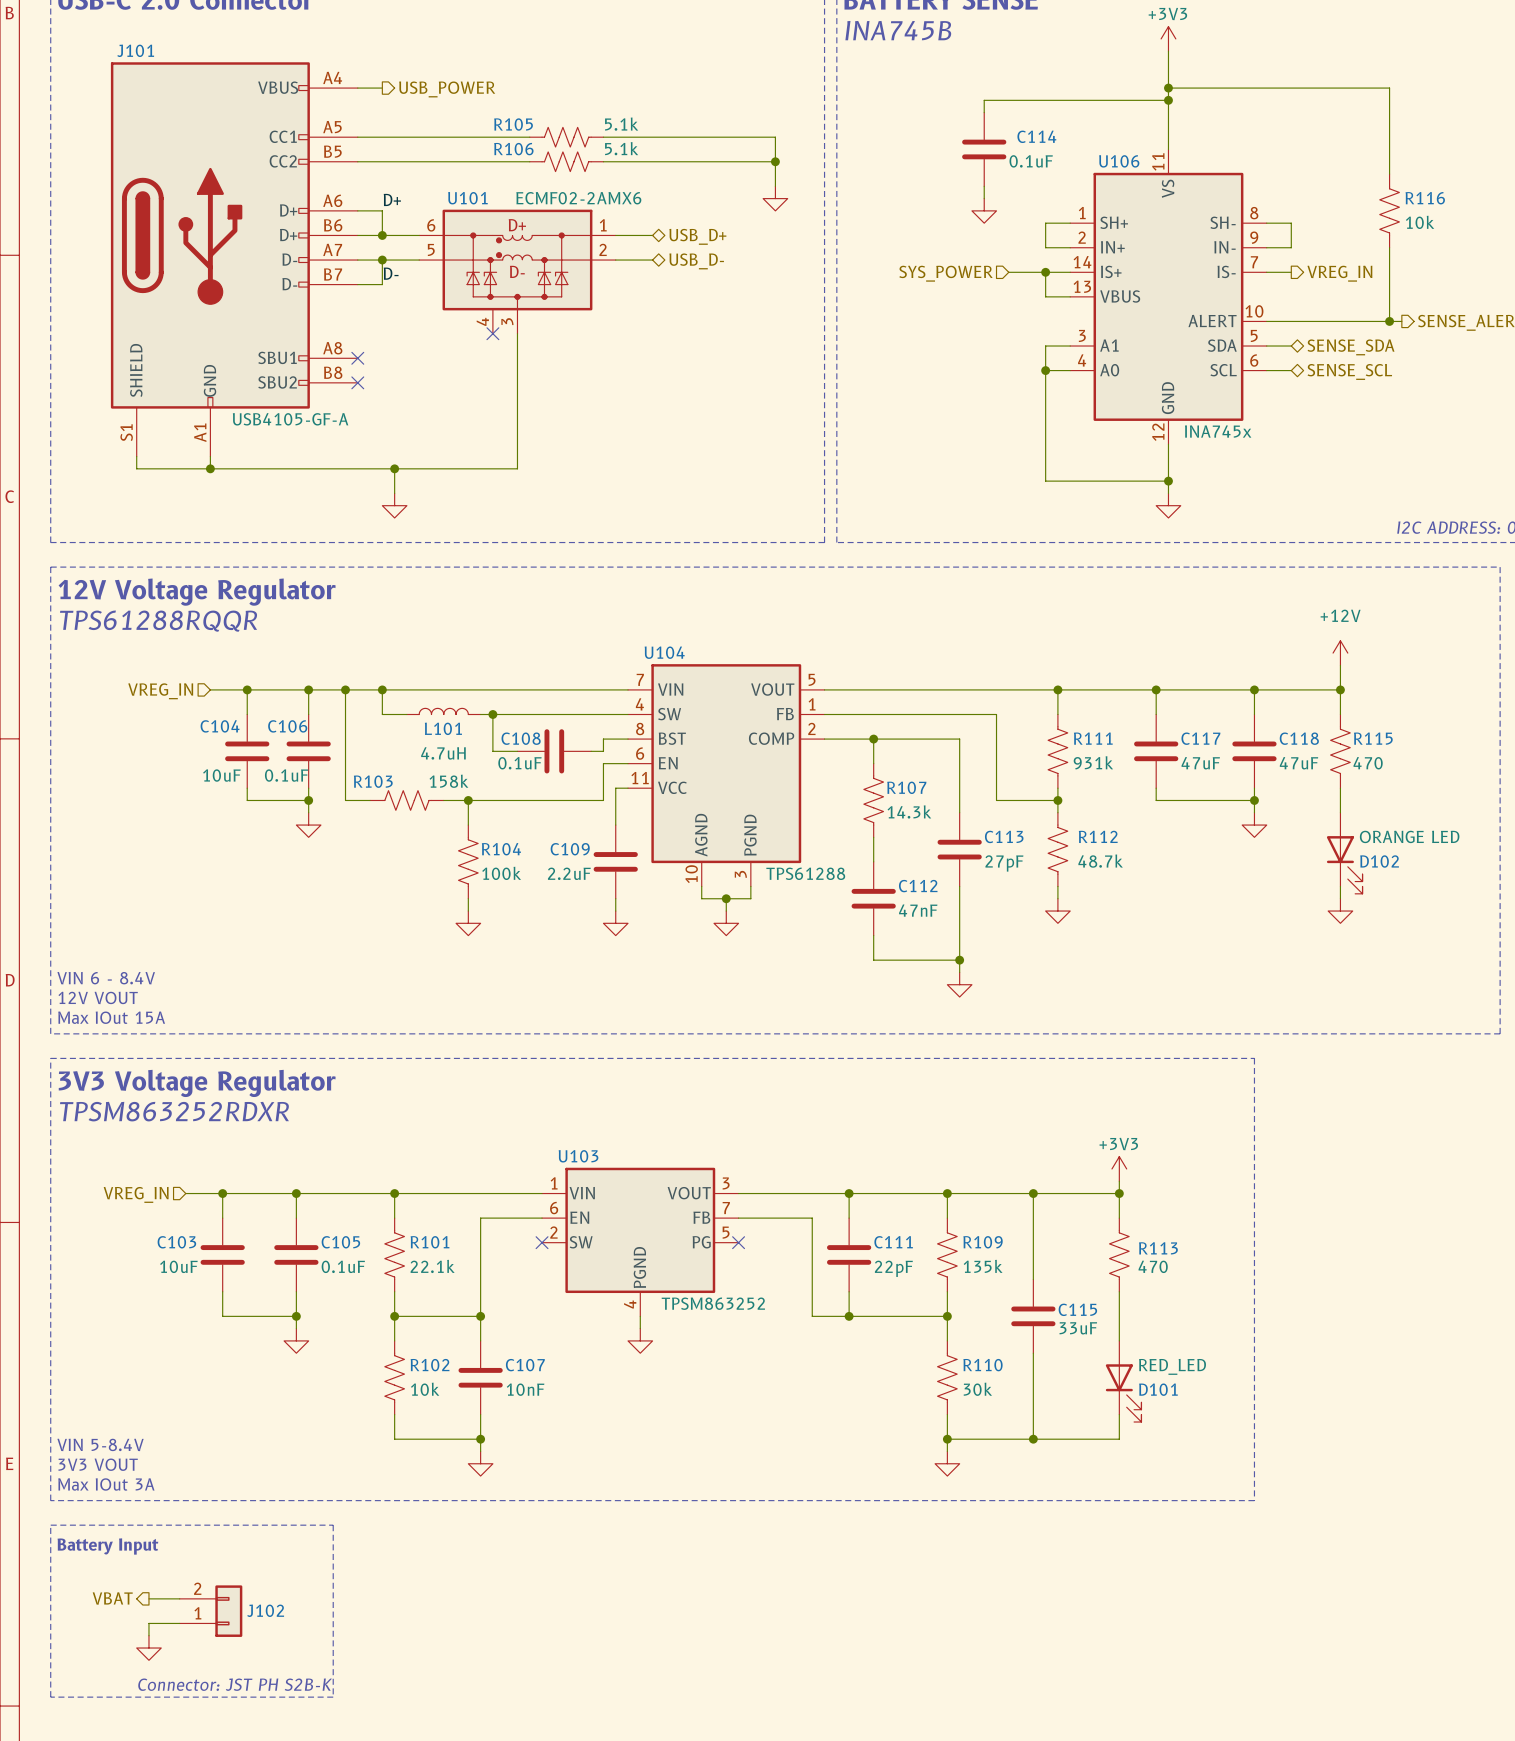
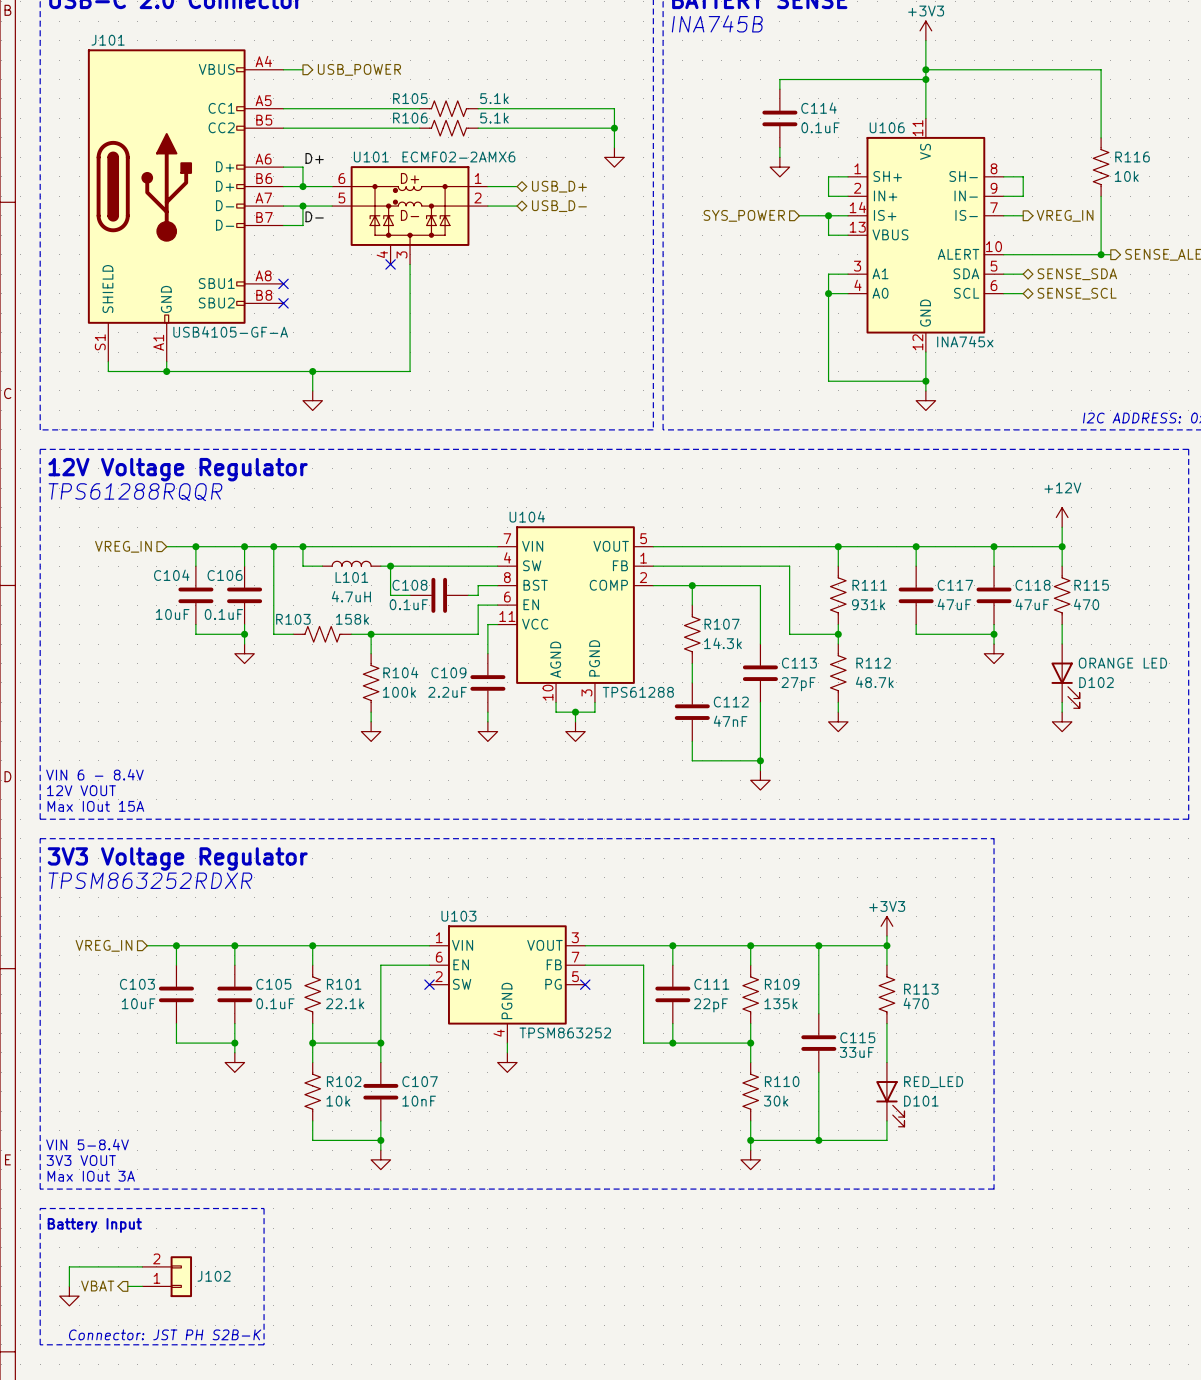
hierarchical label position: VBAT (112, 1598) -> VBAT (97, 1286)
wire: none -> (118, 1266) (69, 1266) (69, 1286)
wire: (161, 1623) (148, 1623) (148, 1635) -> none
power symbol position: (148, 1648) -> (69, 1296)

